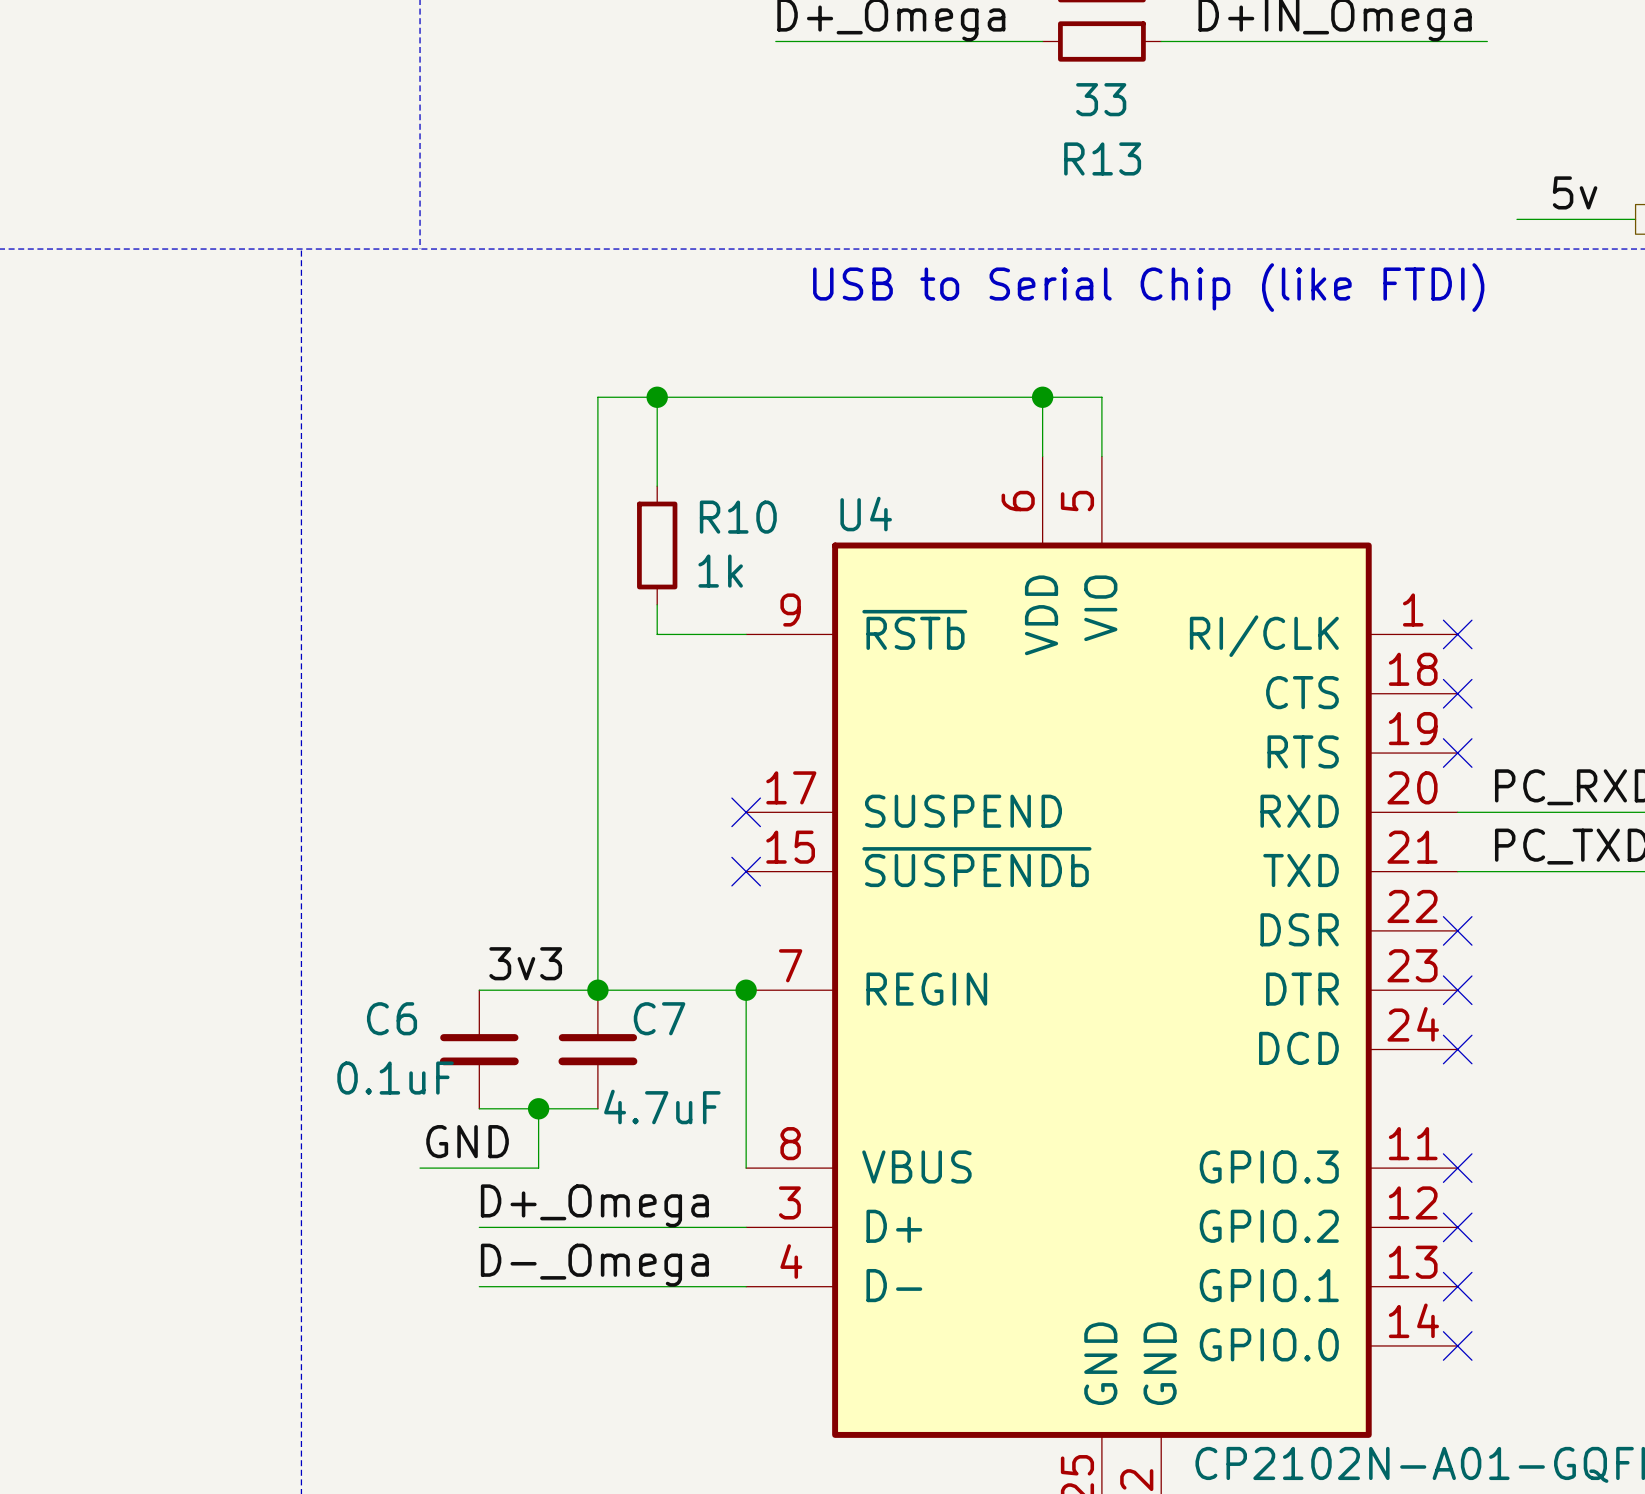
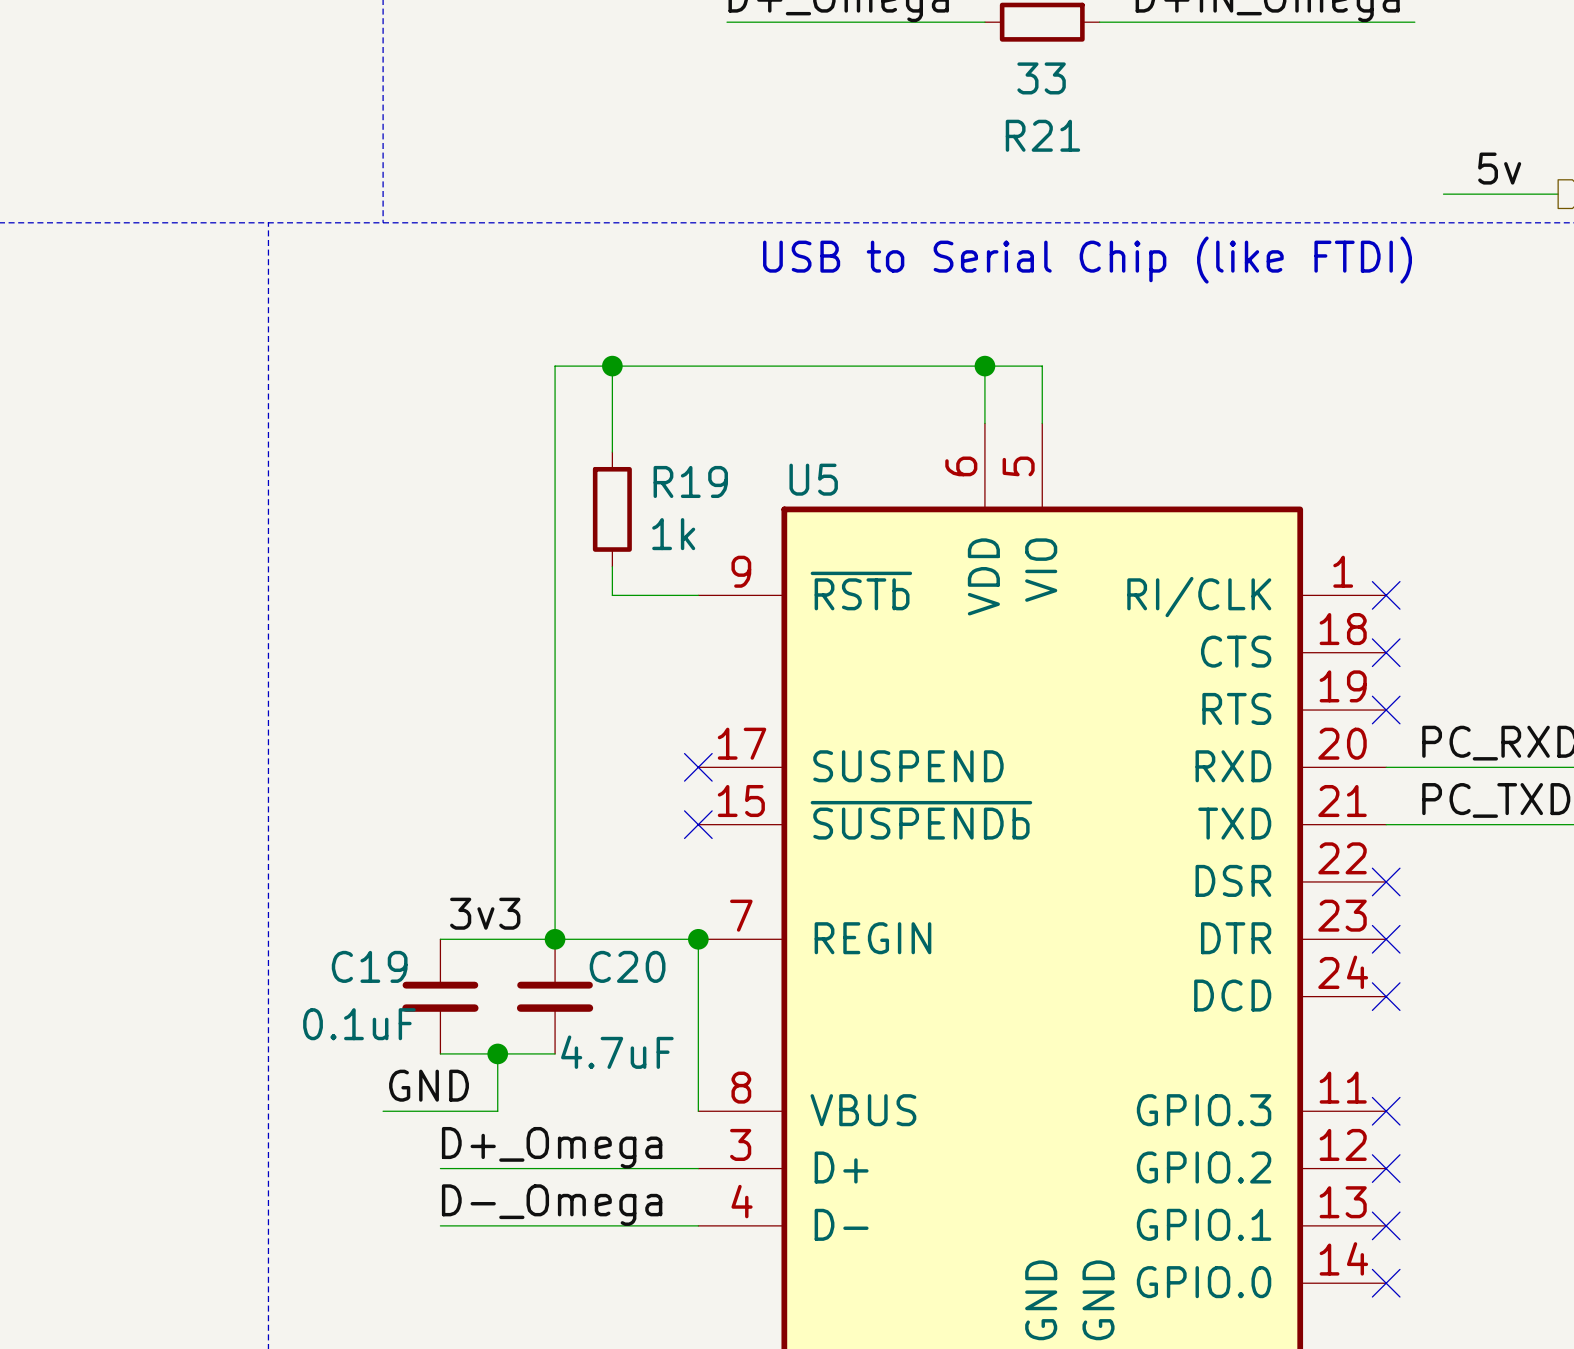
R13 name: R13 (1102, 158) -> R21 (1042, 135)
U4 name: U4 (866, 514) -> U5 (813, 479)
R10 name: R10 (738, 517) -> R19 (690, 481)
C6 name: C6 (392, 1018) -> C19 (369, 966)
C7 name: C7 (659, 1018) -> C20 (627, 966)

